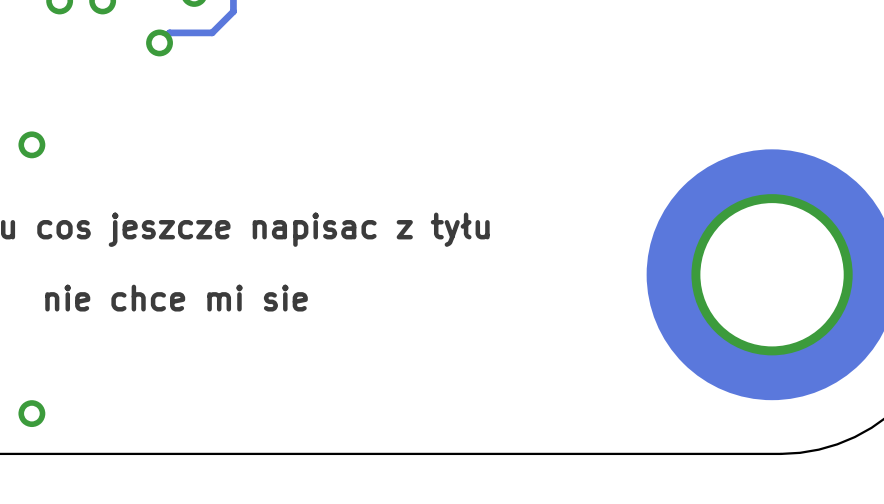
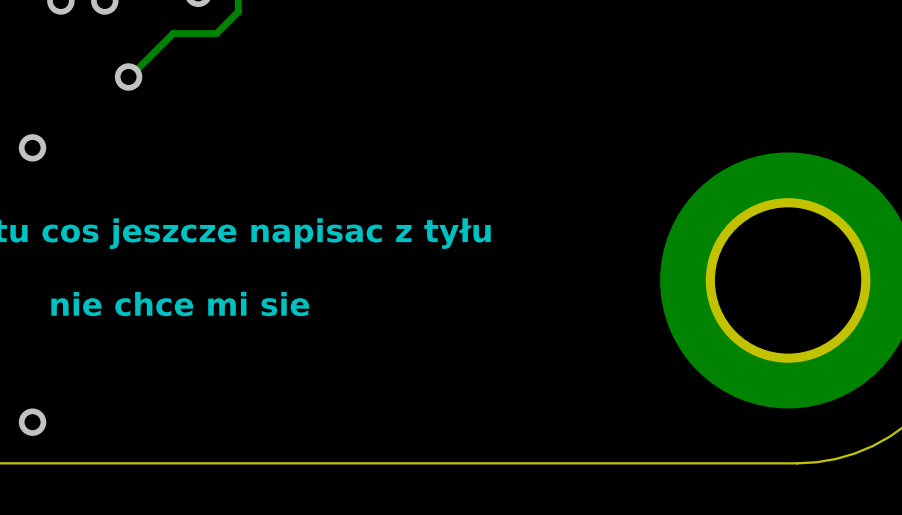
track: none -> (162, 43) (128, 77)
via position: (159, 42) -> (128, 77)

